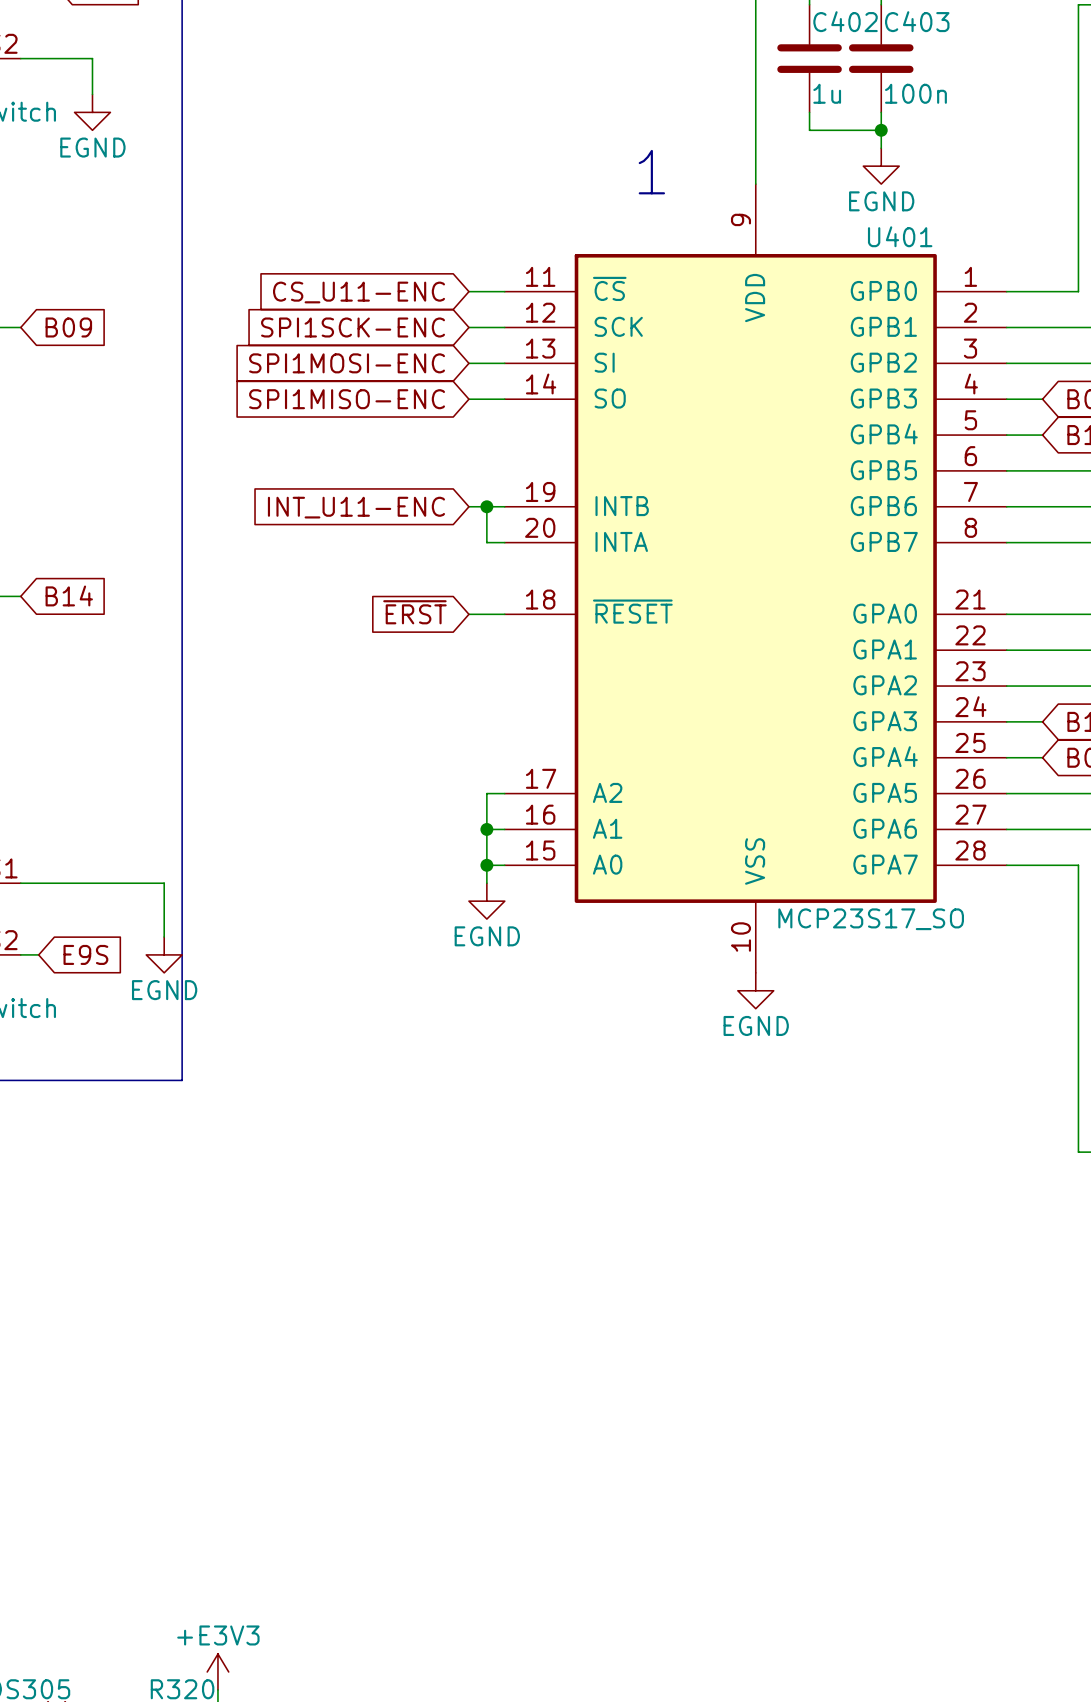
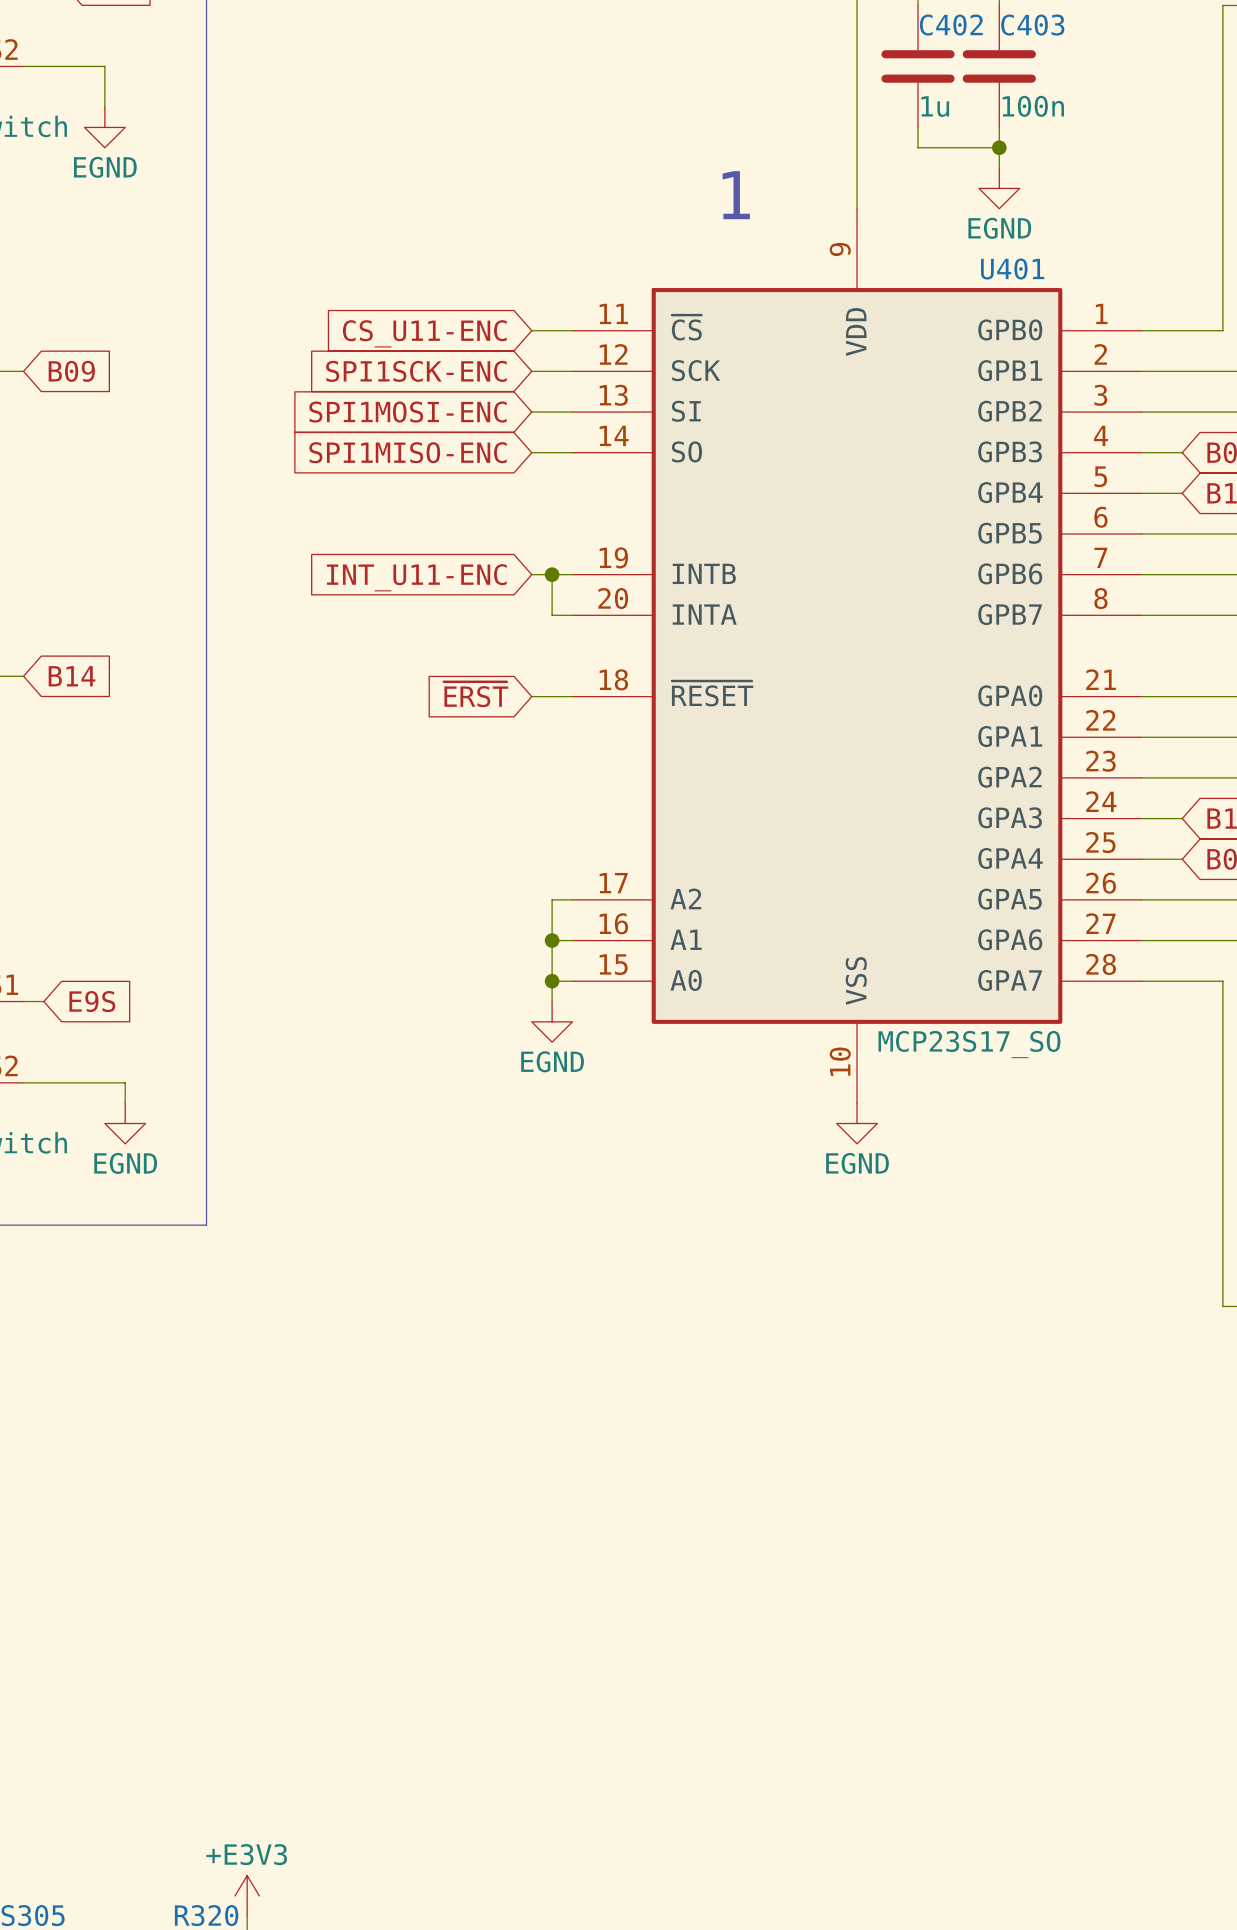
wire: (38, 883) (164, 883) (164, 937) -> none
wire: none -> (43, 1082) (125, 1082) (125, 1103)
global label position: E9S (85, 954) -> E9S (92, 1001)
power symbol position: EGND (164, 954) -> EGND (125, 1123)

